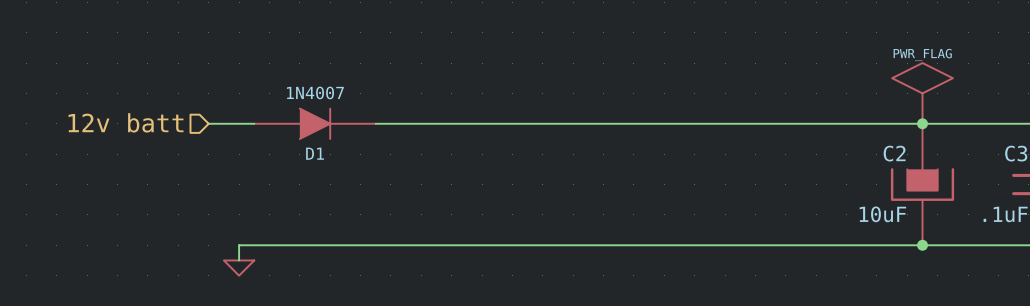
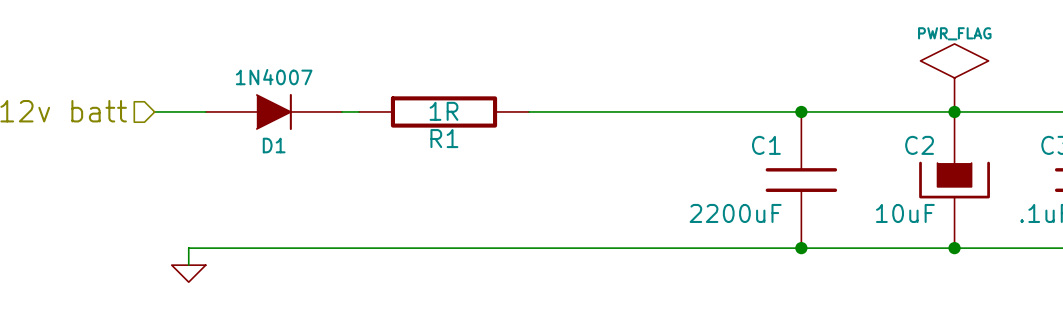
wire: (390, 123) (542, 123) -> none
R1: none -> 1R (444, 111)
junction: none -> (801, 111)
C1: none -> 2200uF (801, 180)
junction: none -> (801, 248)

